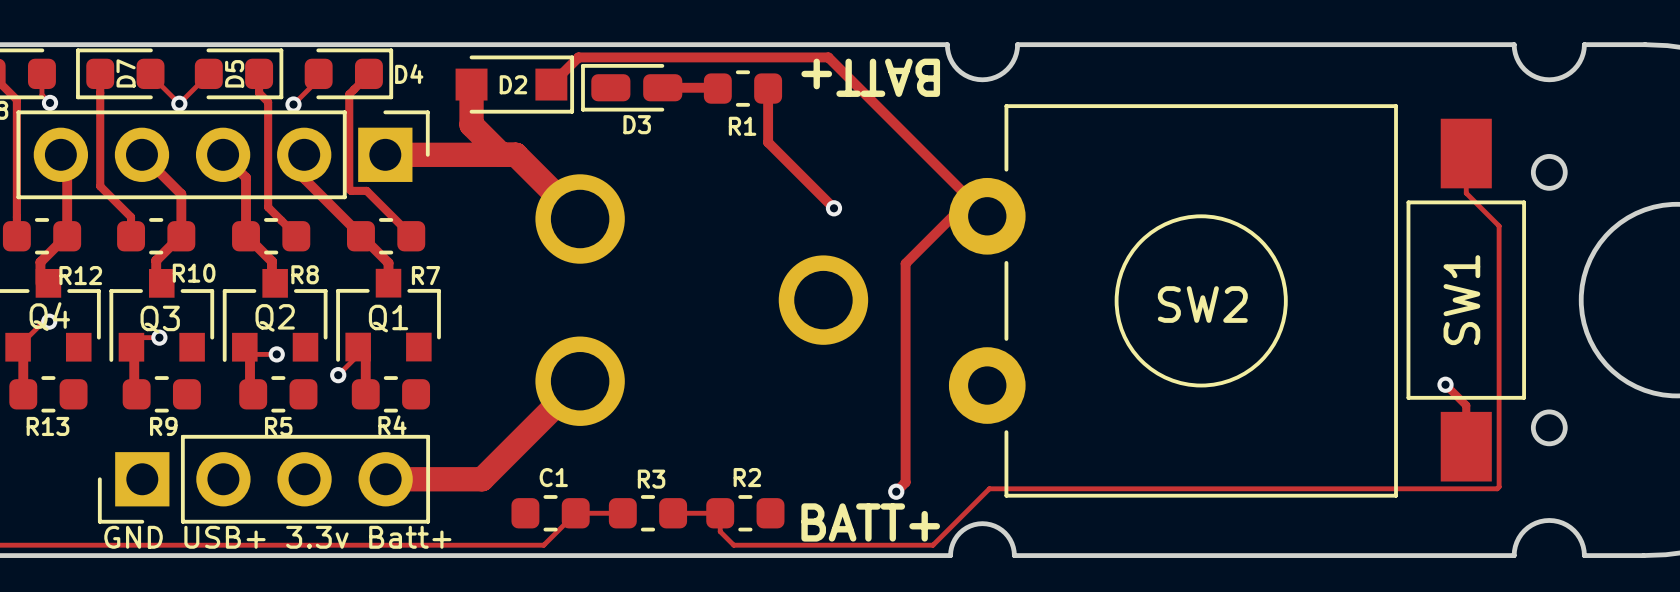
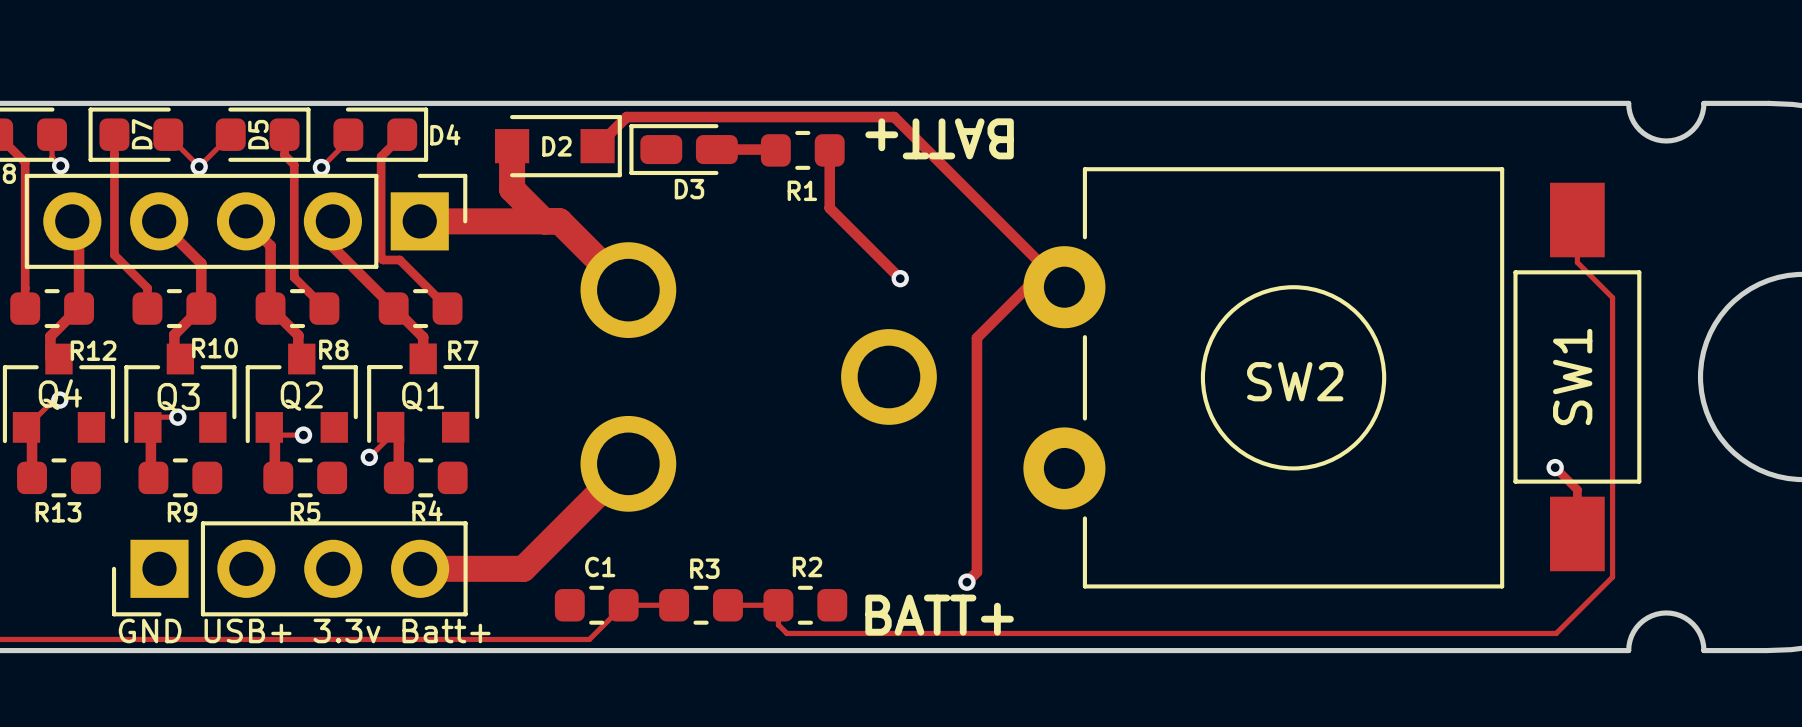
board edge: (947, 44) (950, 58) (957, 69) (969, 77) (982, 79) (995, 77) (1007, 69) (1014, 58) (1017, 44) -> (1021, 103) (1096, 103)
round board edge: [1530, 154, 1568, 191] -> none
round board edge: [1530, 409, 1568, 447] -> none
track: (1497, 488) (989, 488) (932, 545) (733, 545) (728, 539) -> (1610, 579) (1556, 633) (786, 633)
board edge: (950, 555) (952, 543) (959, 533) (970, 526) (982, 523) (994, 526) (1005, 533) (1011, 543) (1014, 555) -> (1025, 650) (1093, 650)

